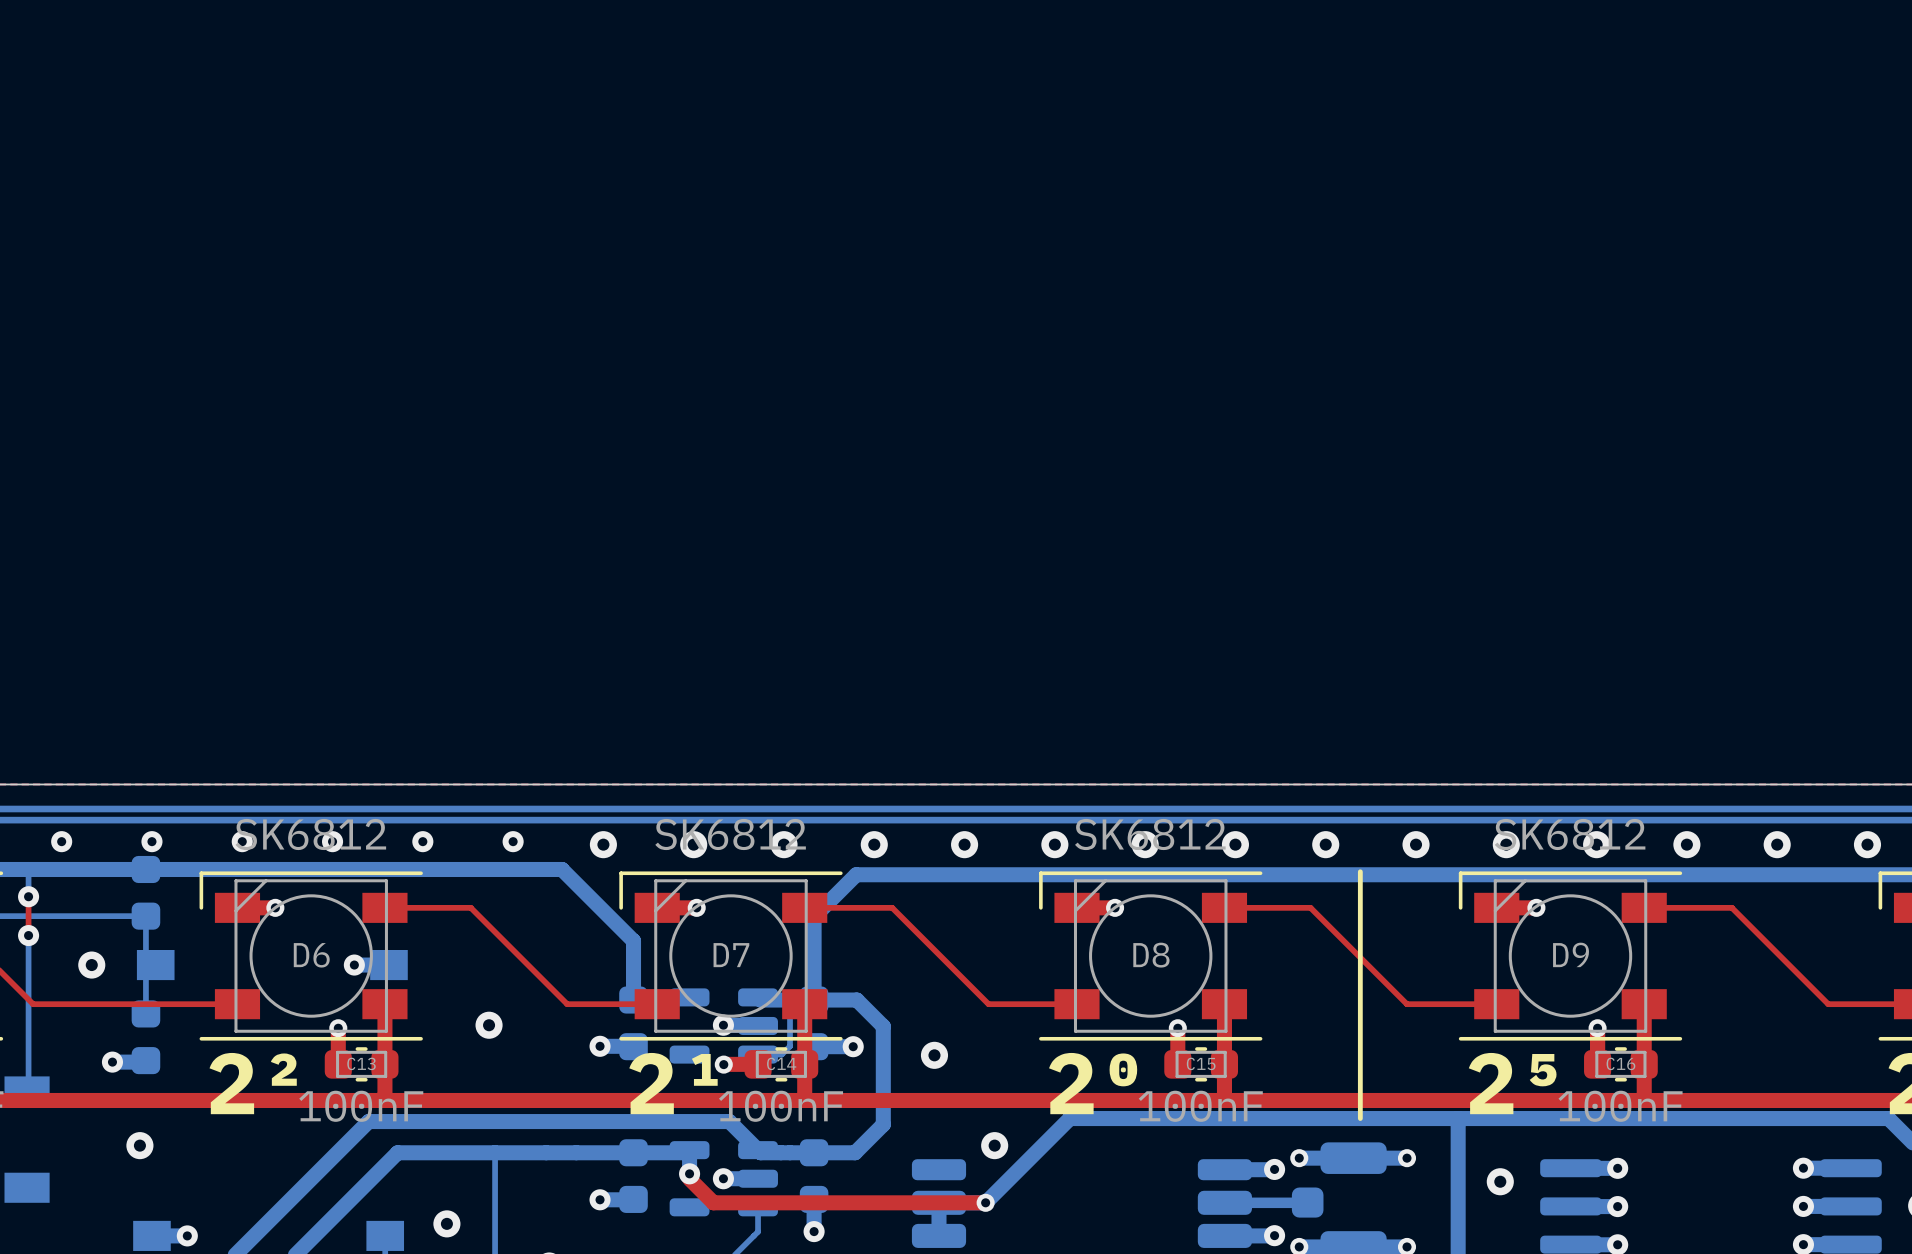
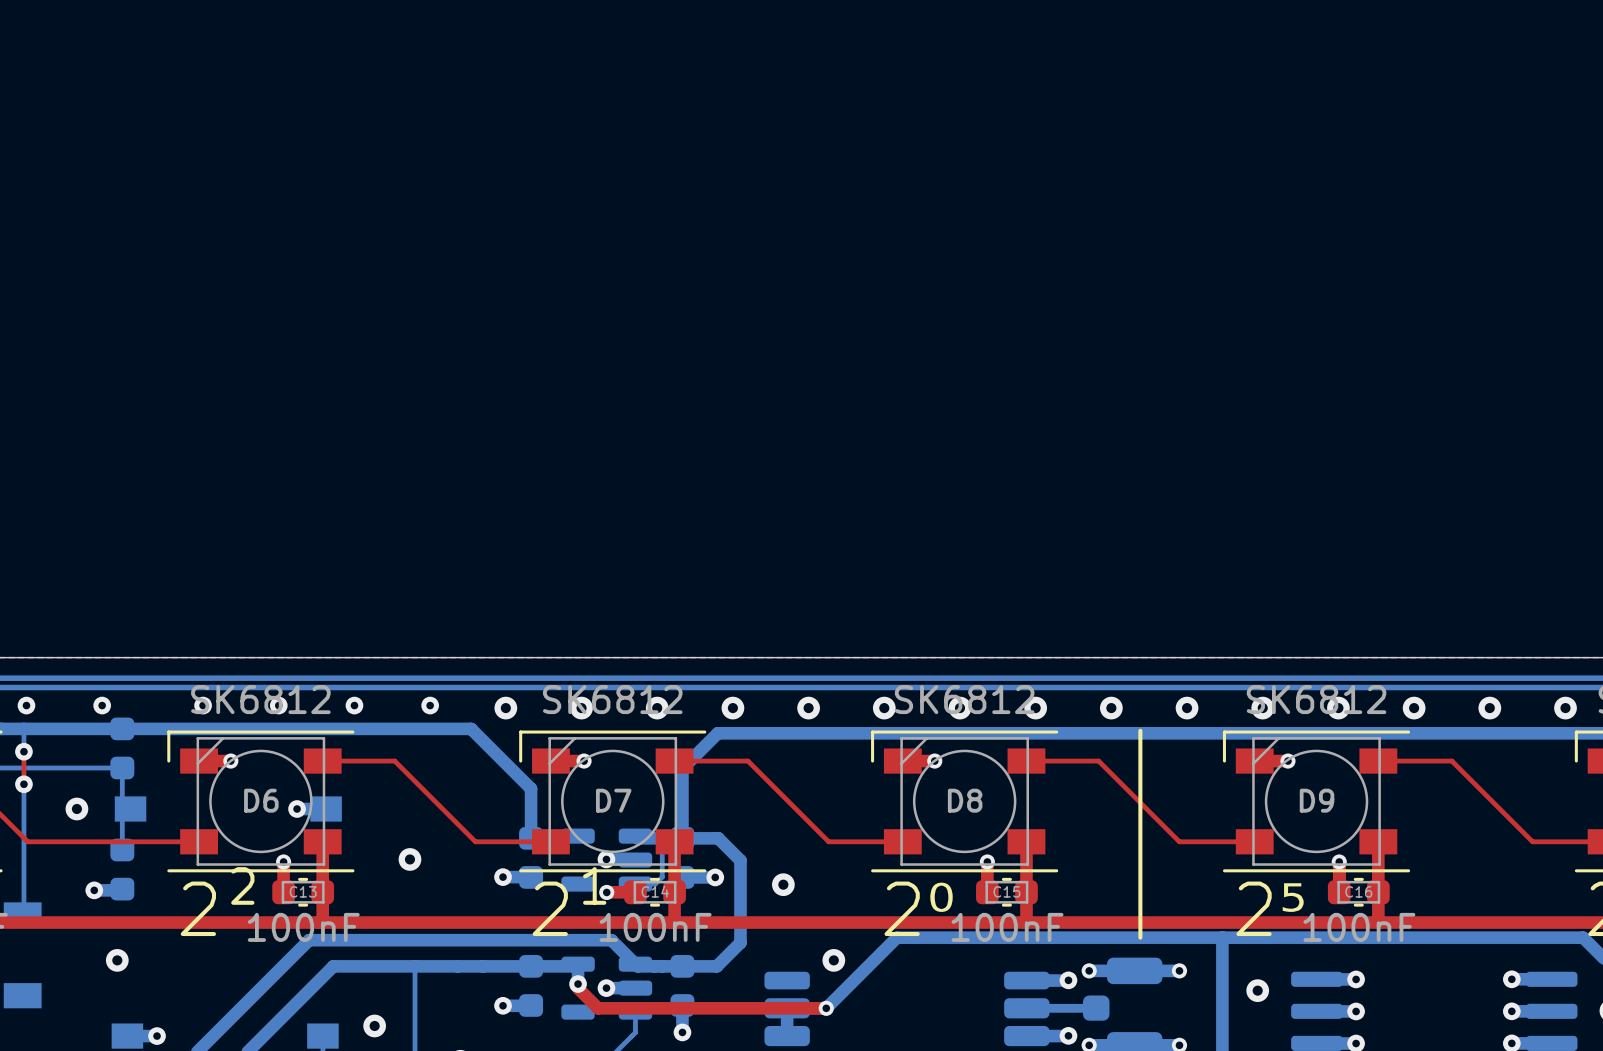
via: none -> (26, 705)
via: (61, 841) -> none
via: none -> (102, 705)
via: (151, 841) -> none

